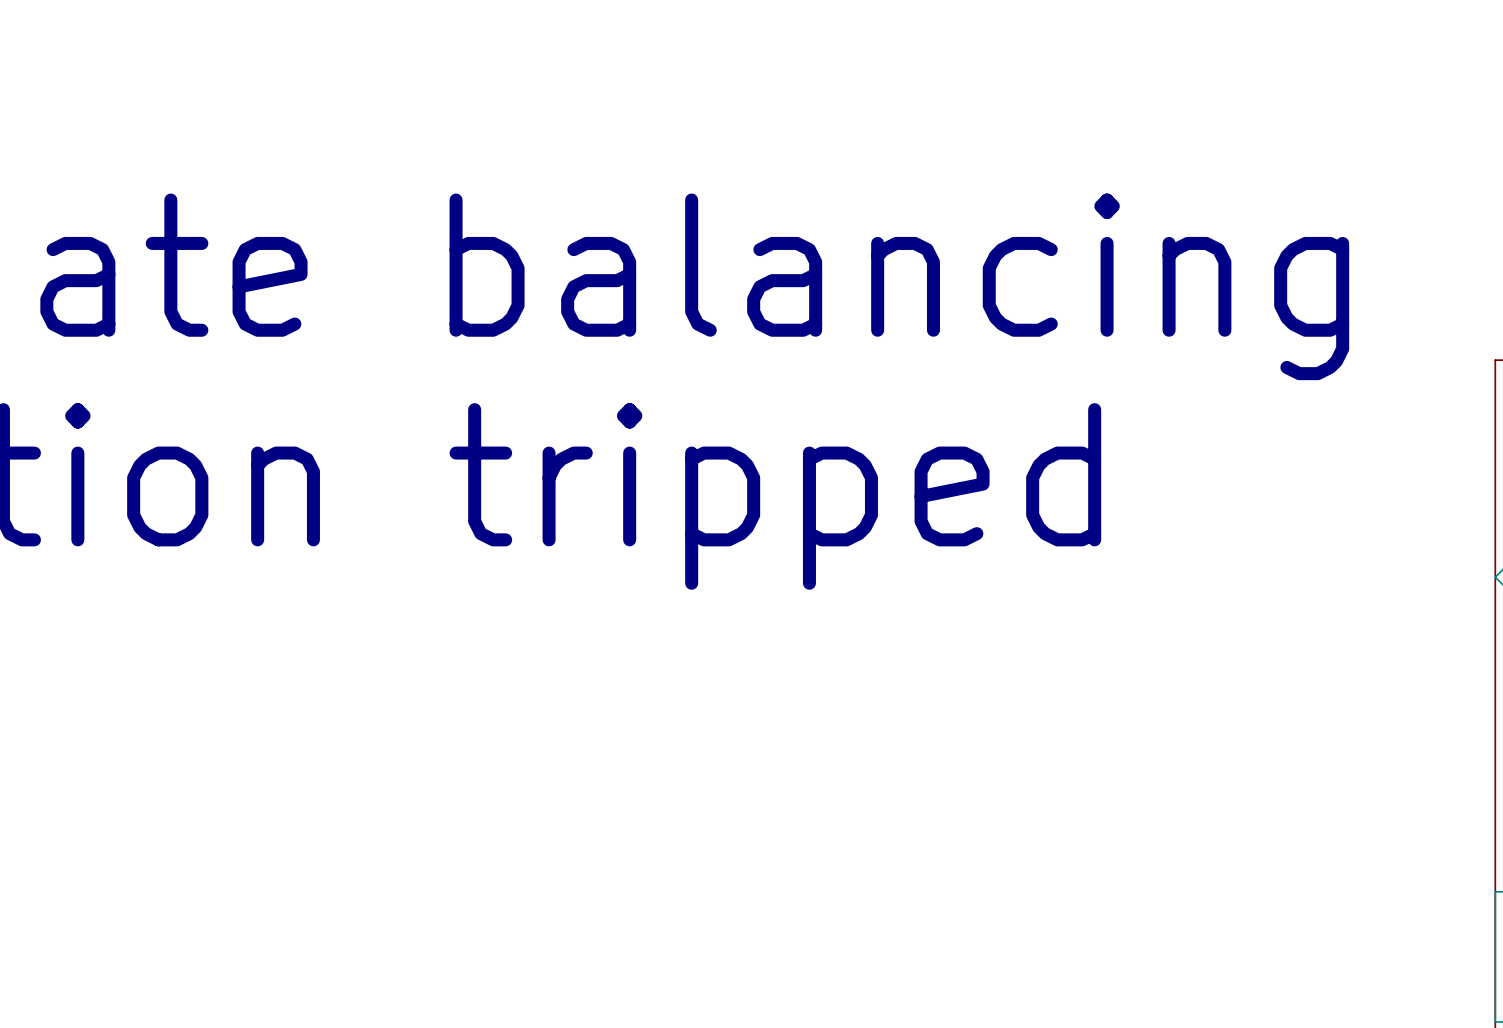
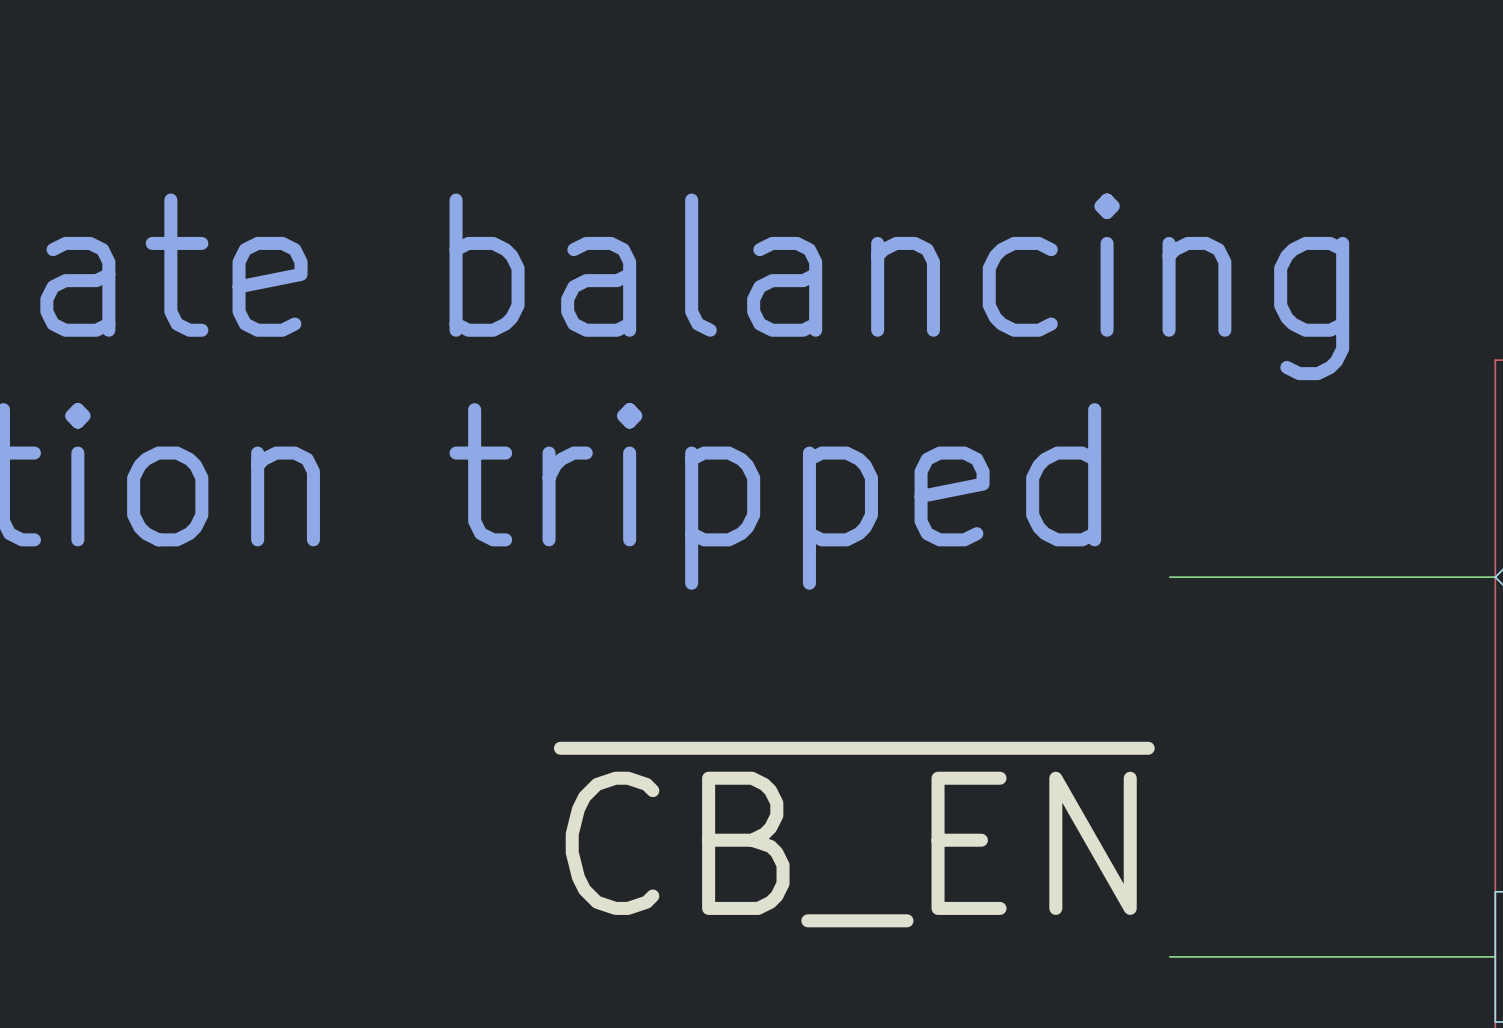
wire: none -> (1169, 577) (1495, 577)
label: none -> ~{CB_EN} (854, 834)
wire: none -> (1169, 956) (1495, 956)

